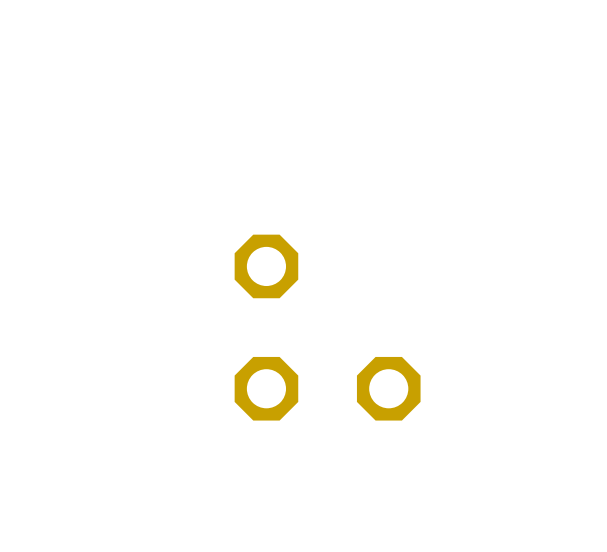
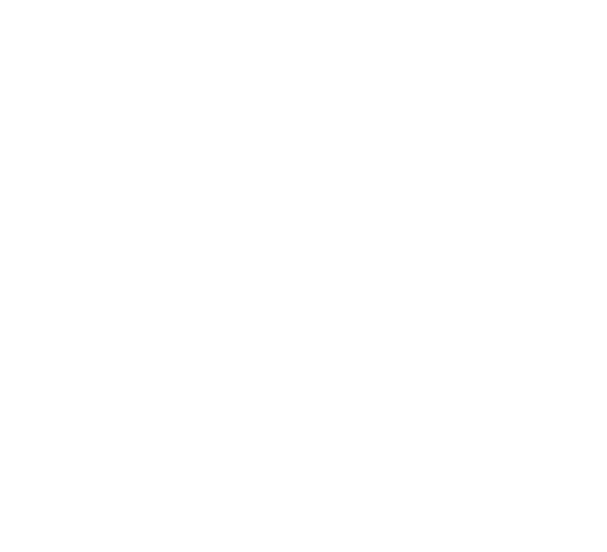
part: (327, 327) -> none

